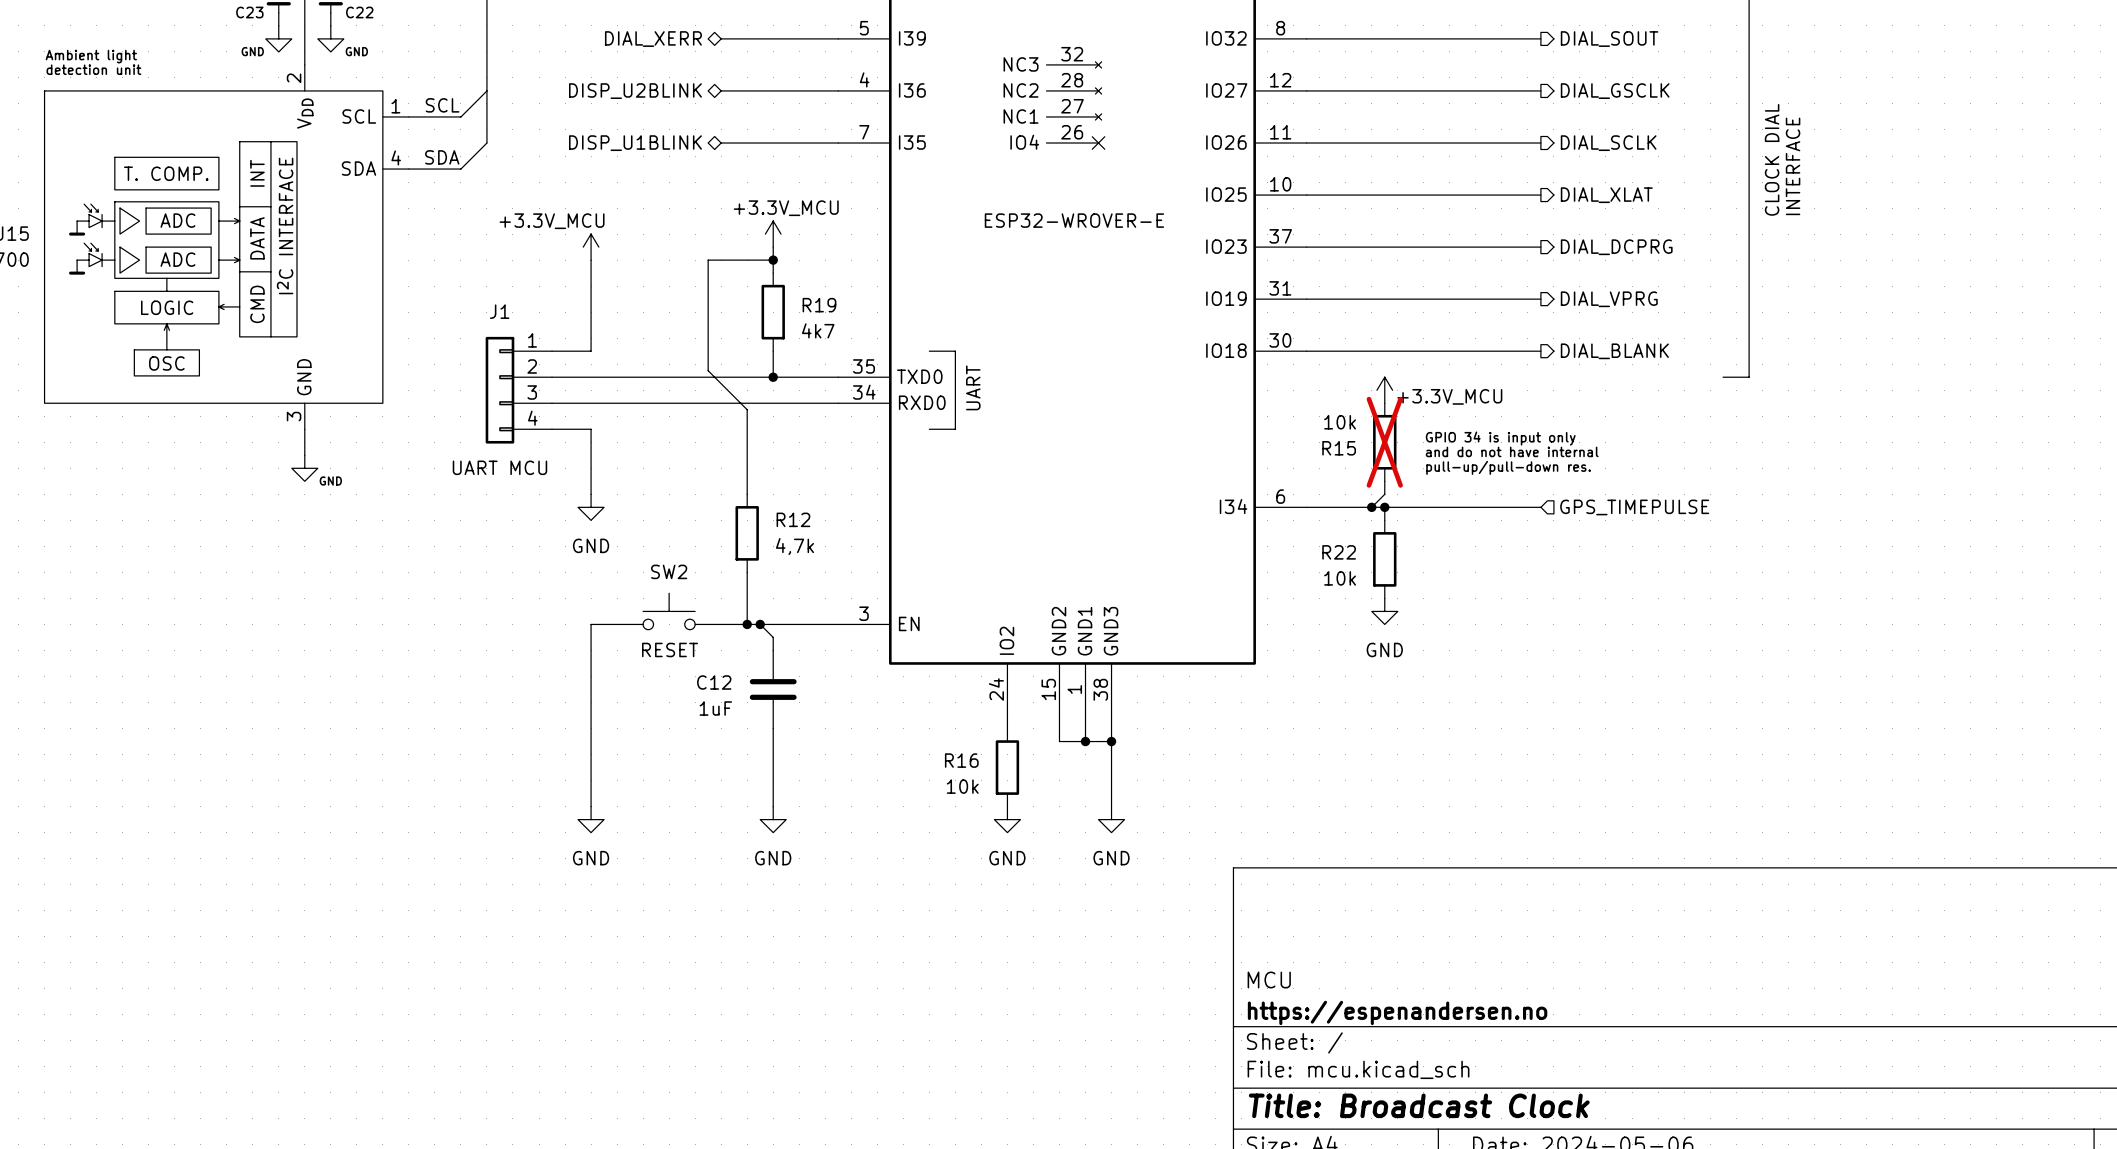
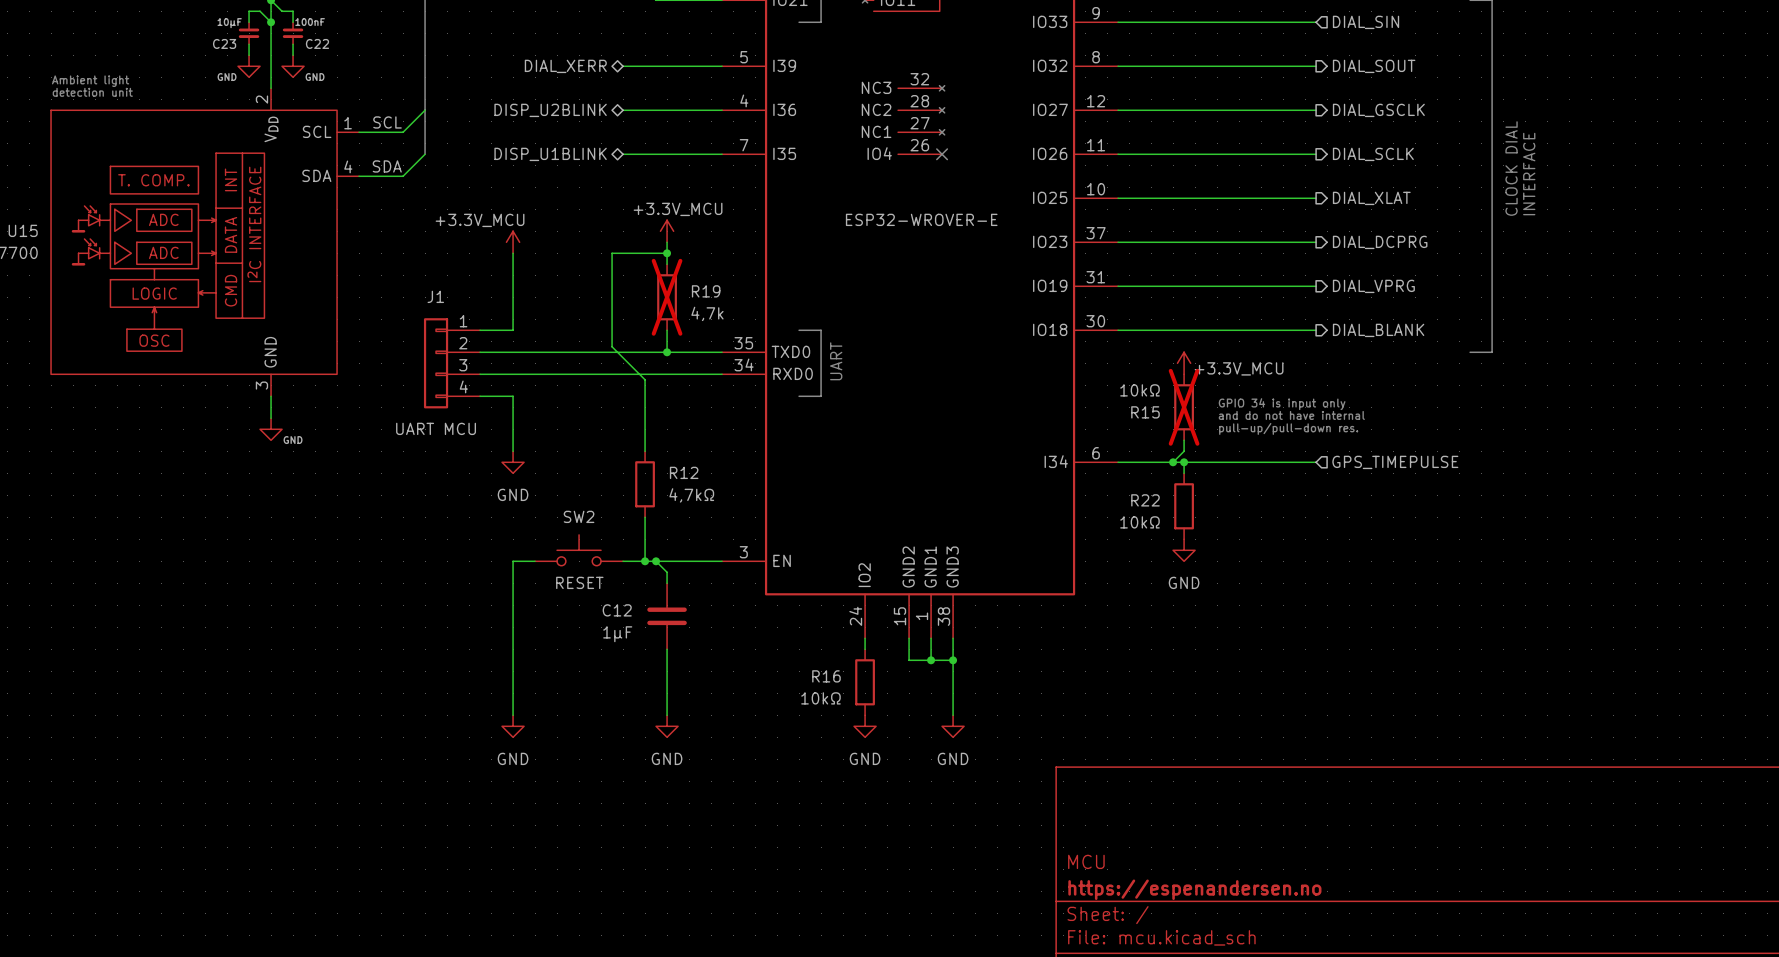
R19 do-not-place cross: none -> (667, 297)
R19 value: 4k7 (818, 330) -> 4,7k (707, 313)
R15 value: 10k (1340, 422) -> 10kΩ (1139, 390)
R12 value: 4,7k (795, 546) -> 4,7kΩ (691, 495)
R22 value: 10k (1340, 578) -> 10kΩ (1139, 522)
C12 value: 1uF (715, 708) -> 1μF (617, 634)
R16 value: 10k (962, 786) -> 10kΩ (820, 698)

